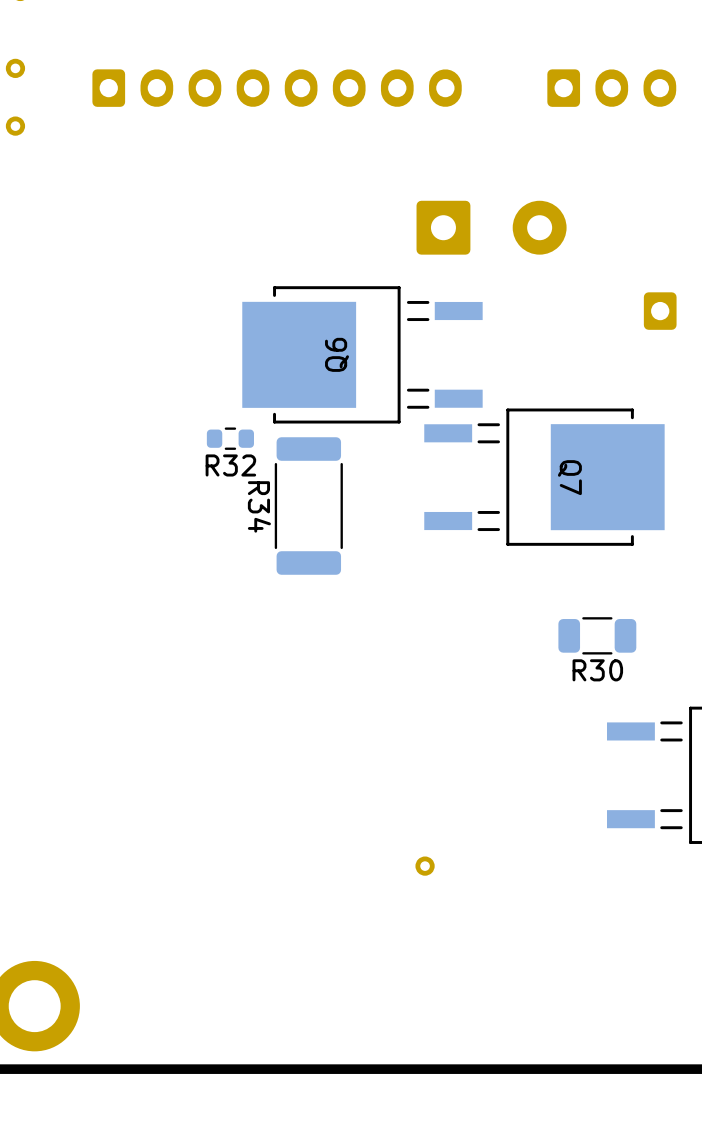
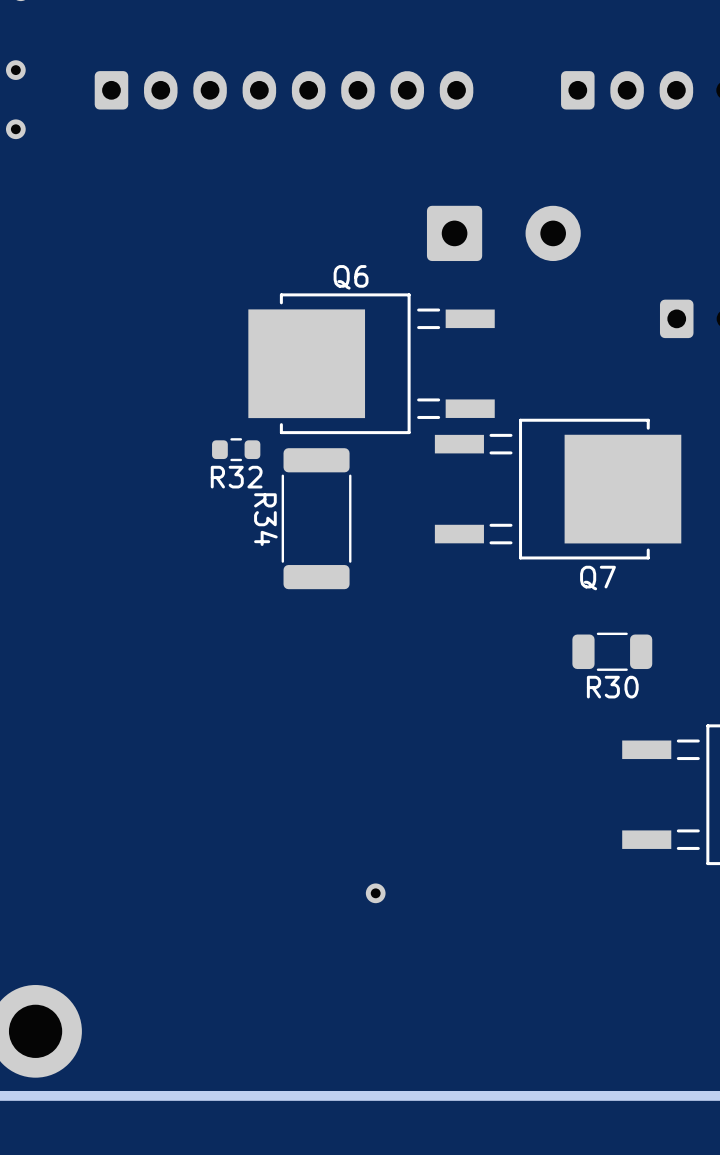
Q6 name rotation: 0° (337, 354) -> 90° clockwise (351, 277)
Q6 name position: Q6 (337, 354) -> Q6 (351, 277)
Q7 name rotation: 0° (569, 477) -> 90° counterclockwise (597, 578)
Q7 name position: Q7 (569, 477) -> Q7 (597, 578)
part position: (425, 866) -> (375, 893)

